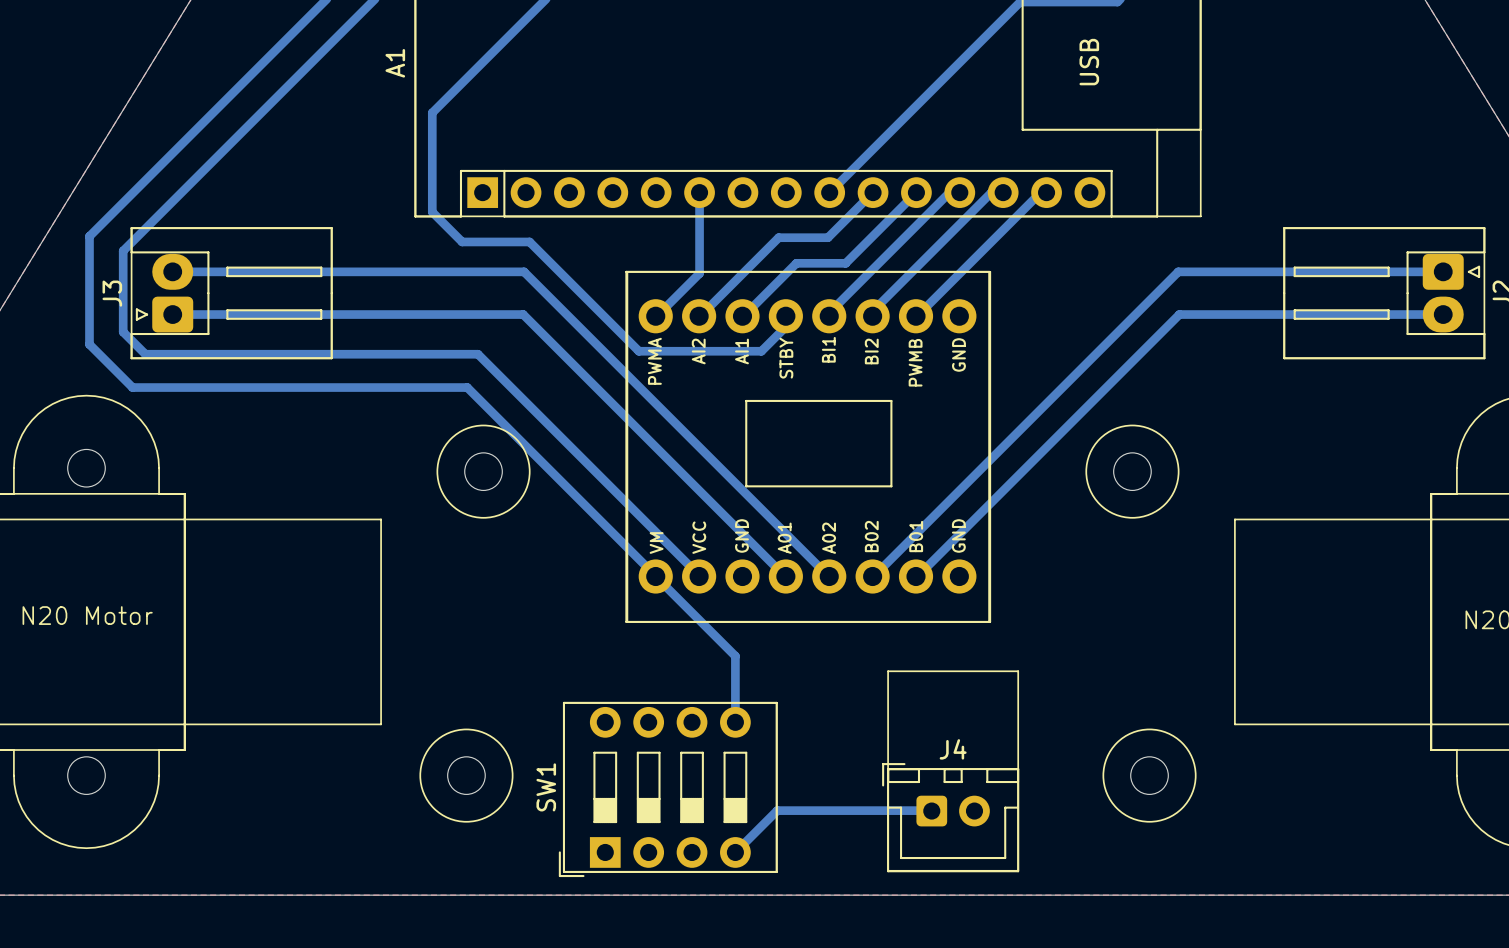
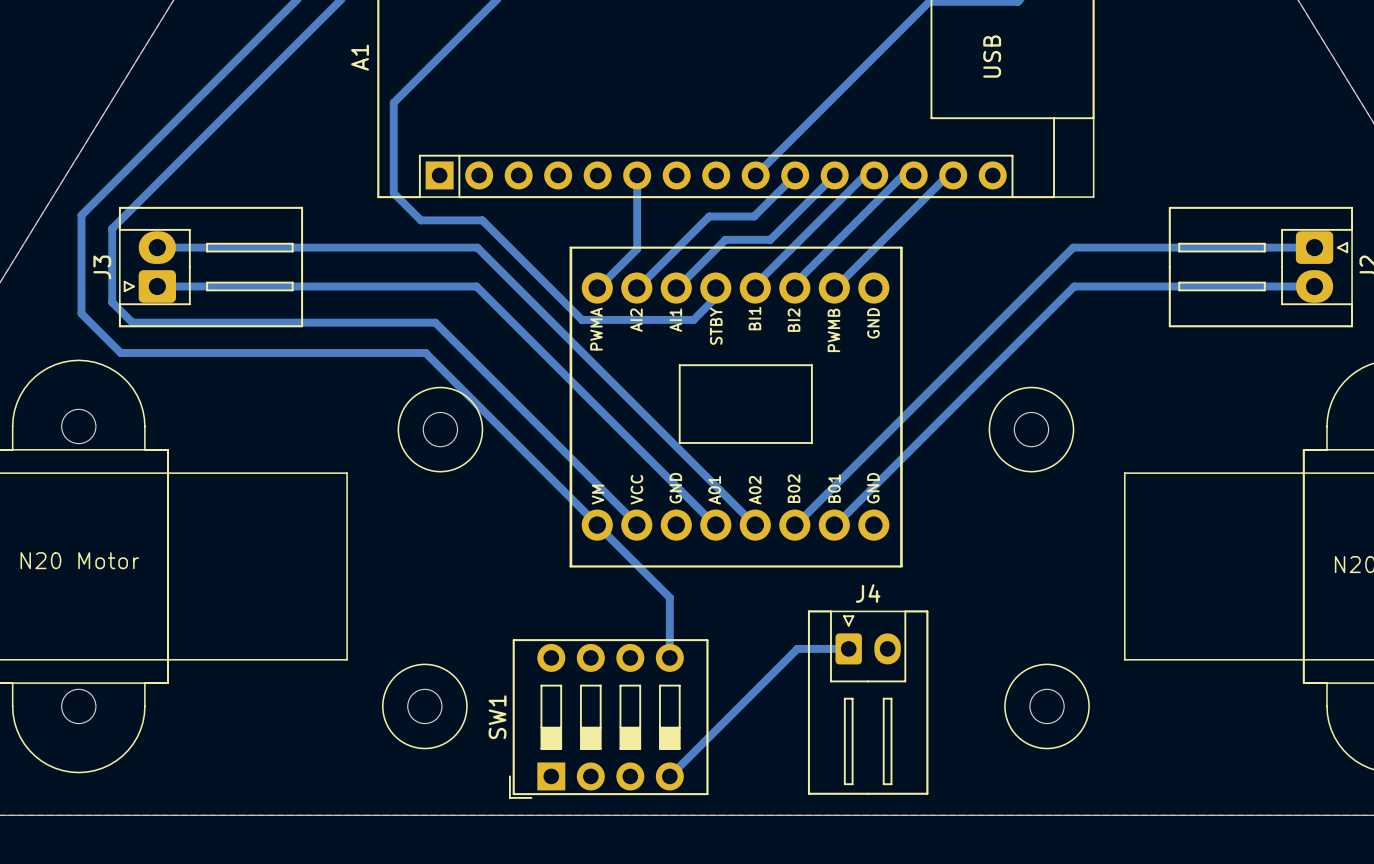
J4 name position: J4 (953, 749) -> J4 (868, 593)
J4 footprint: [882, 763, 1020, 873] -> [807, 610, 929, 795]
bottom track: (777, 810) (931, 811) -> (707, 738) (797, 648) (848, 648)

